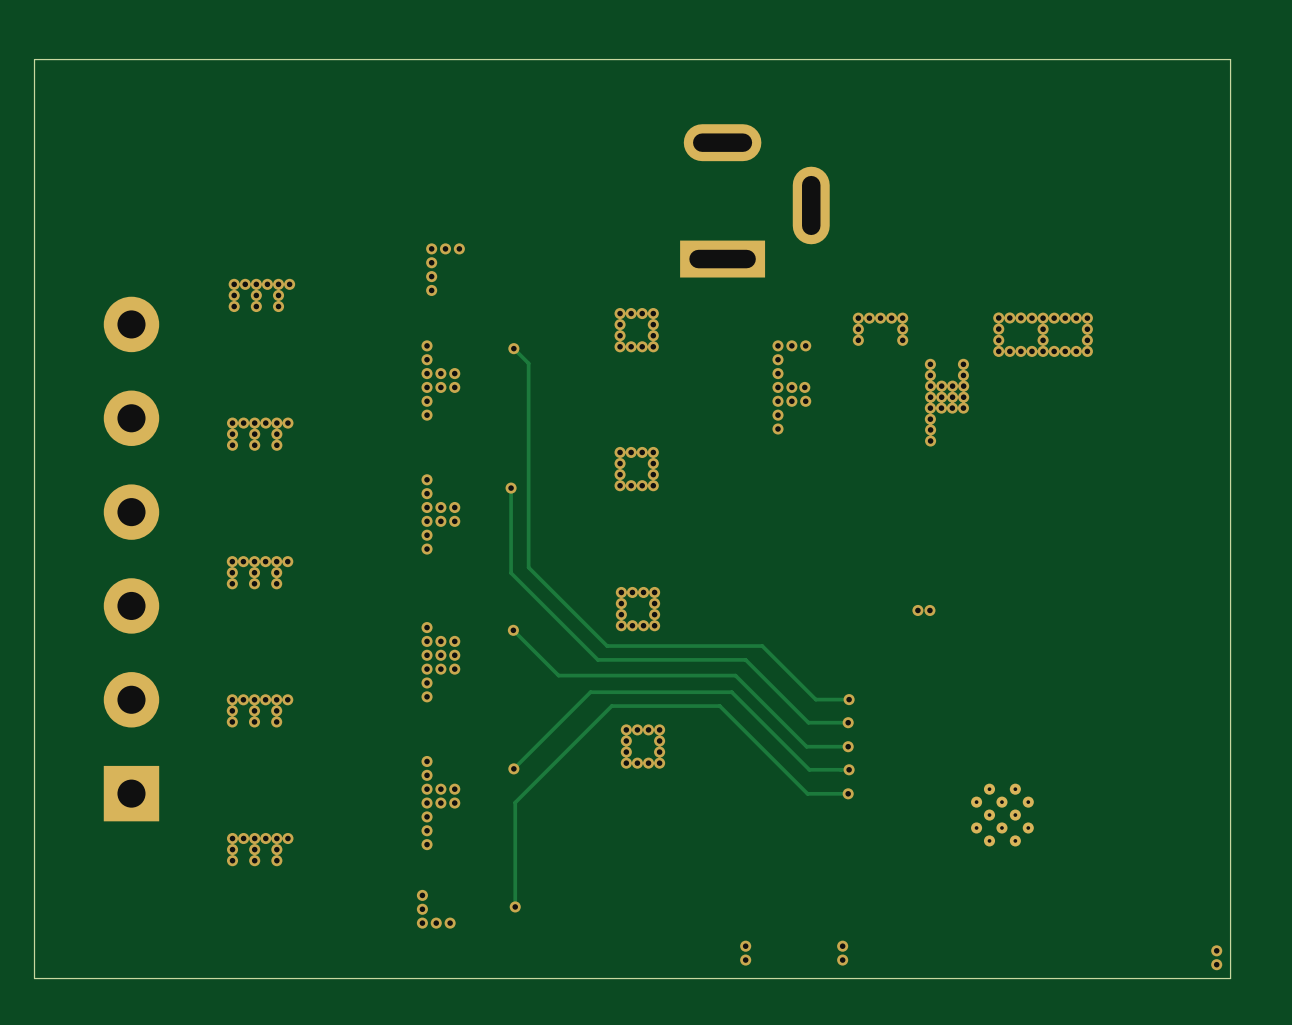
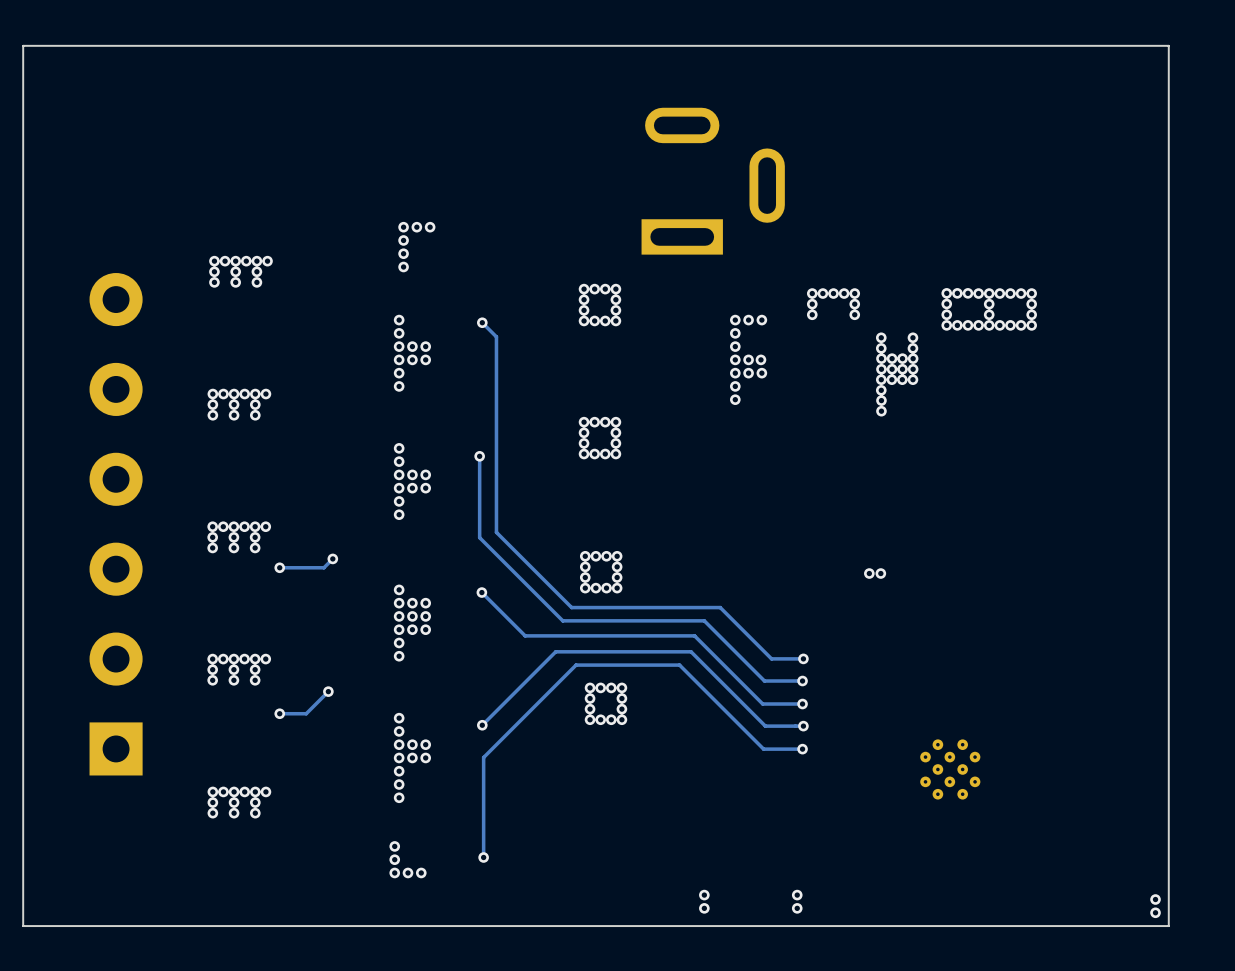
track: none -> (332, 558) (323, 567) (279, 567)
via: none -> (332, 558)
via: none -> (279, 567)
track: none -> (328, 691) (306, 713) (279, 713)
via: none -> (328, 691)
via: none -> (279, 713)

